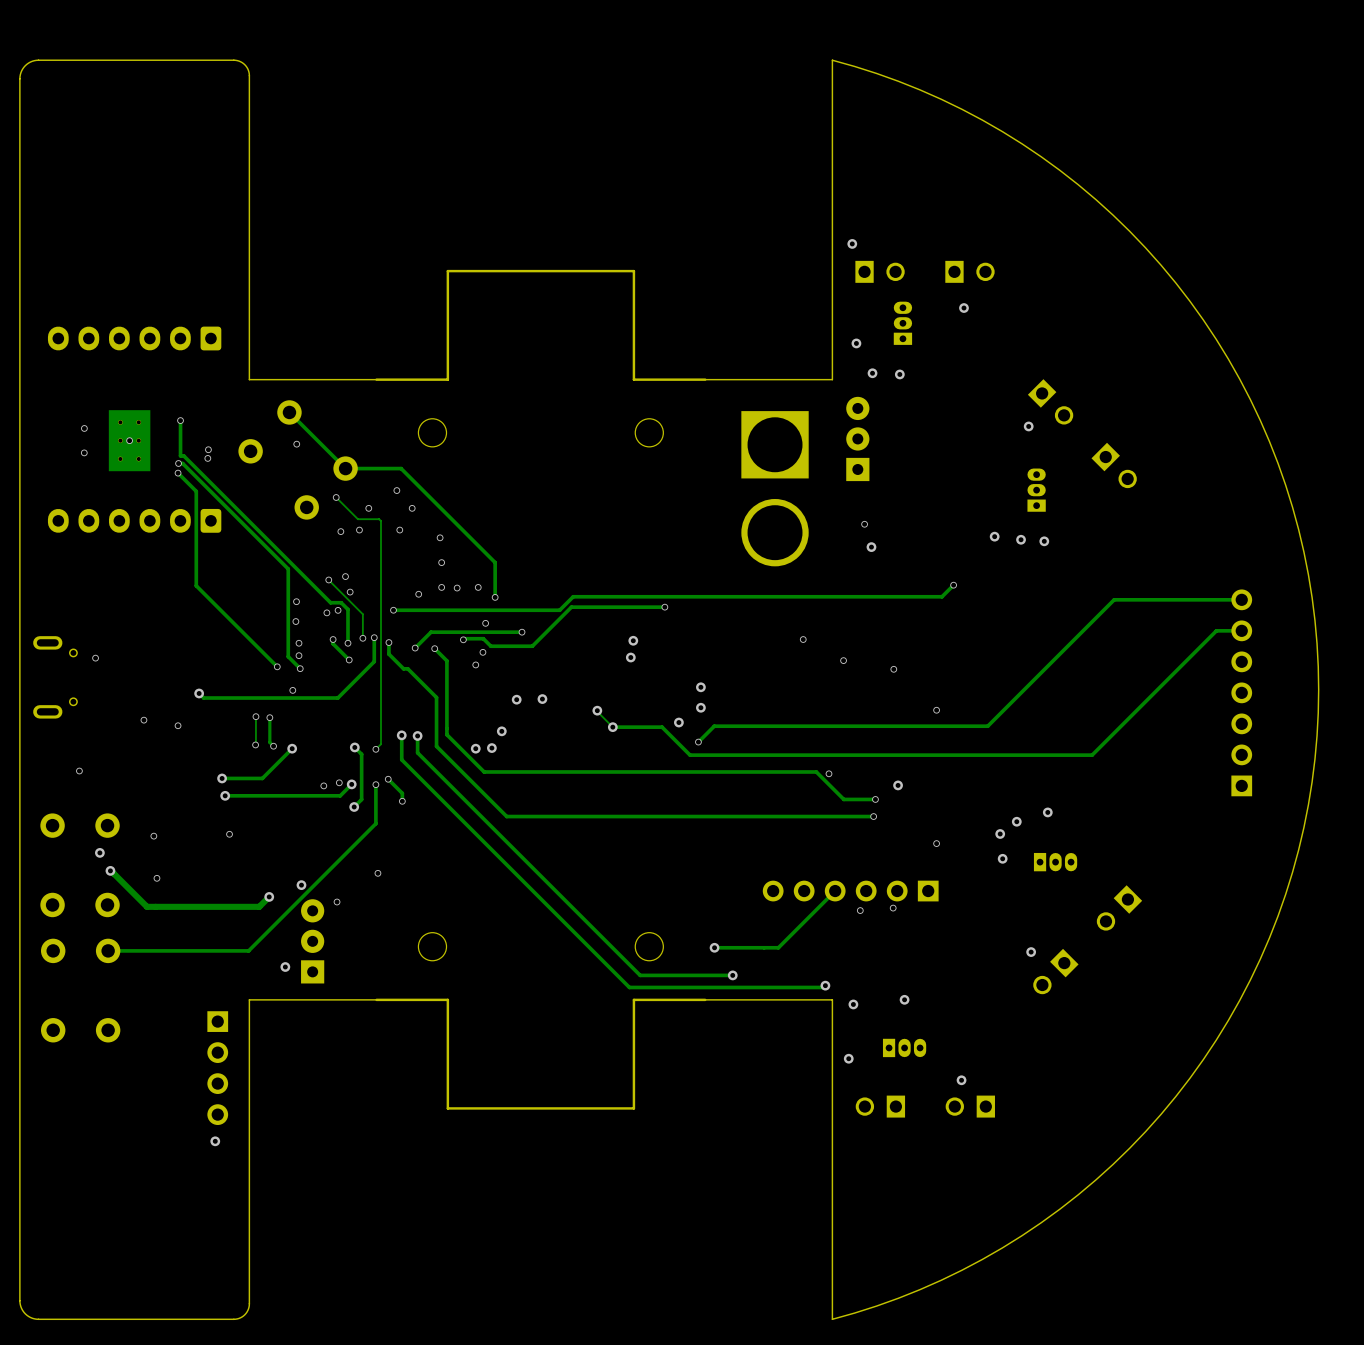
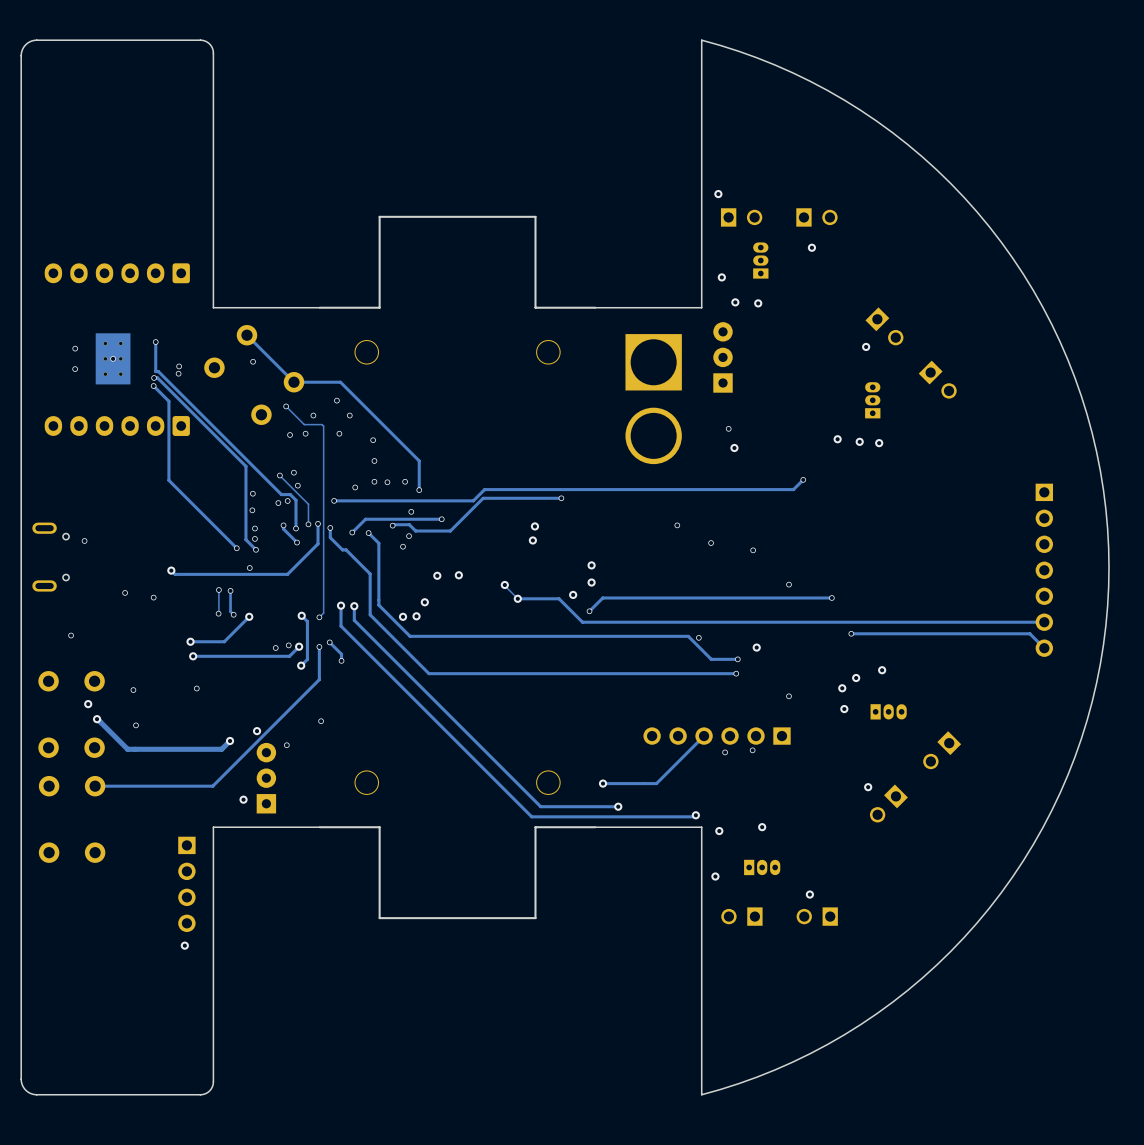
track: (1241, 599) (1114, 599) (987, 726) -> none
track: (1241, 630) (1216, 630) (1092, 755) -> (1044, 622) (919, 622)
part rotation: 0° (1241, 692) -> 180° (1044, 570)
via: none -> (831, 597)
track: none -> (851, 633) (1029, 633) (1044, 648)
via: none -> (851, 633)

